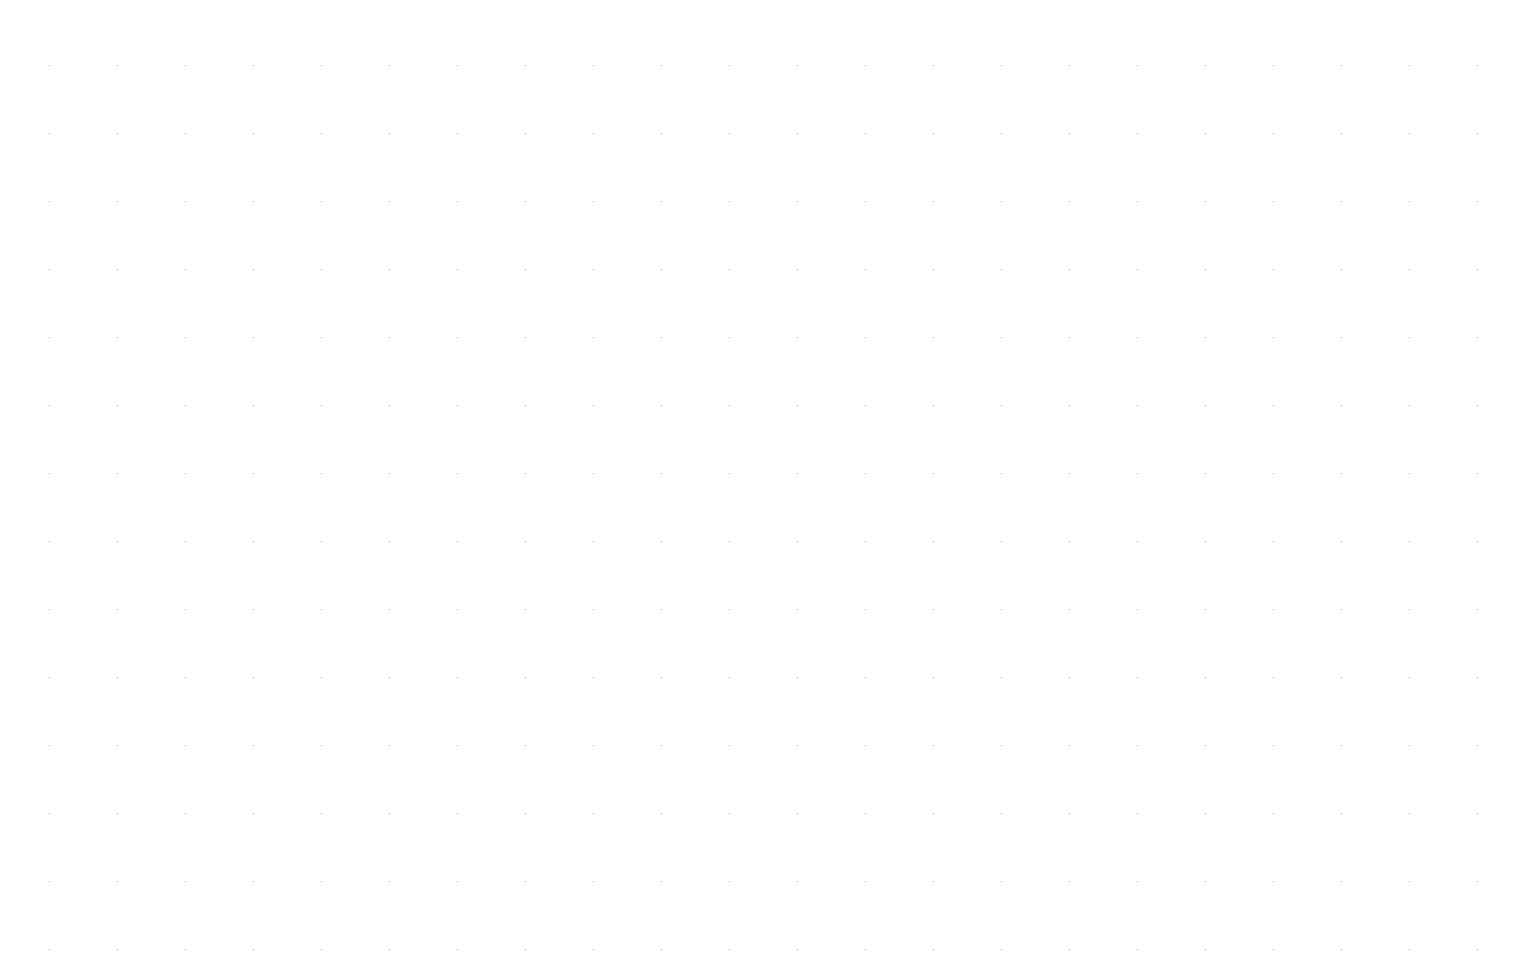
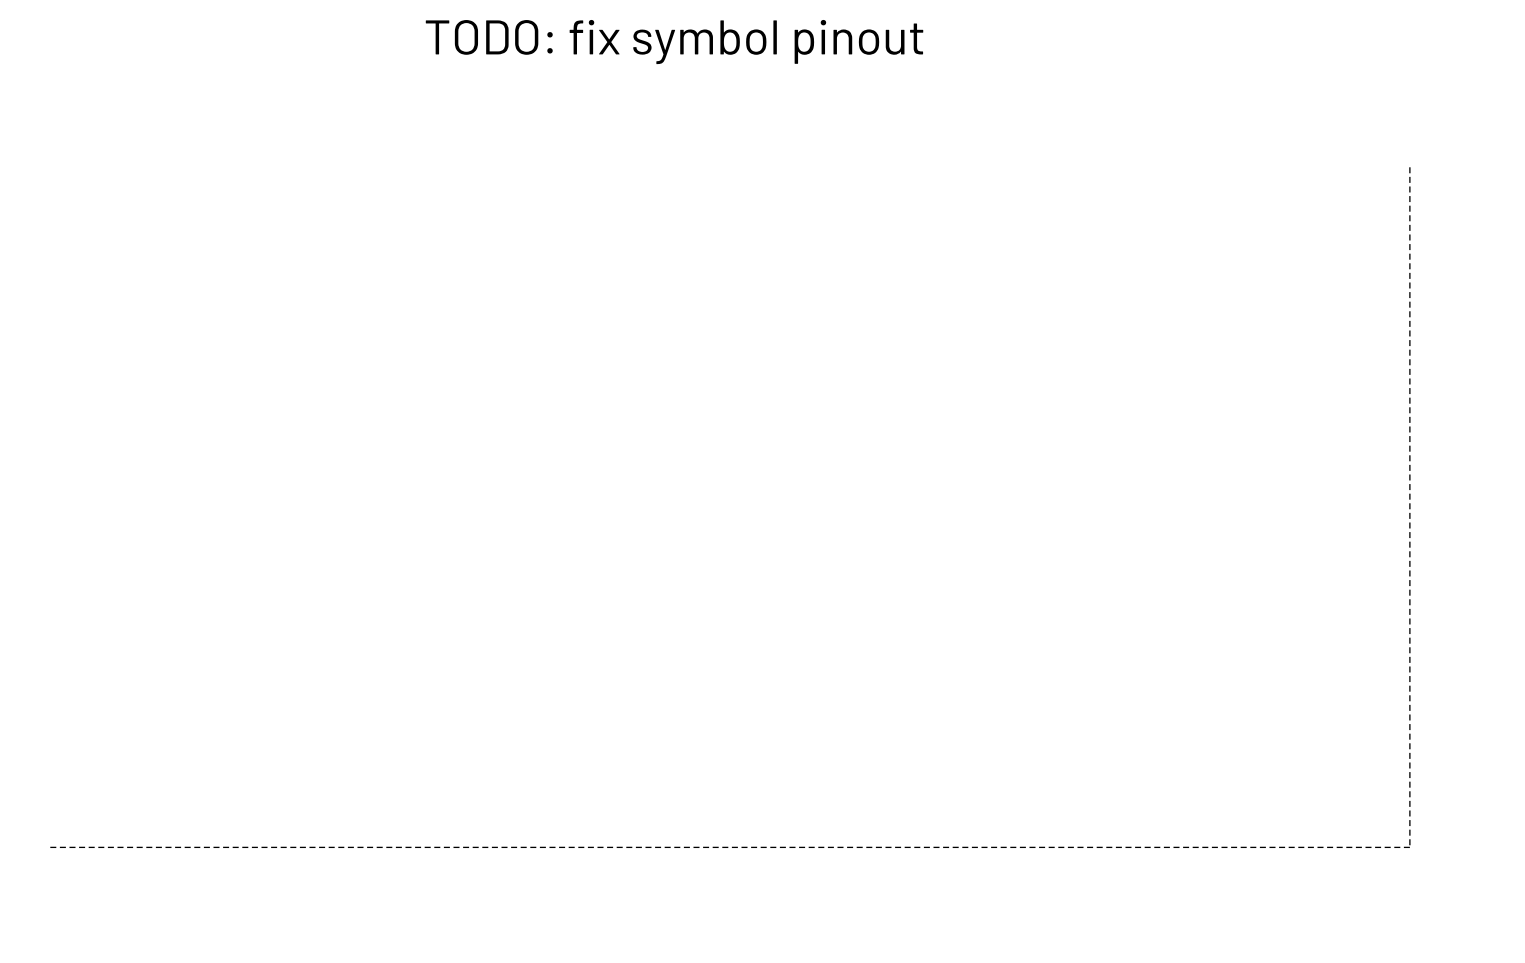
text: none -> TODO: fix symbol pinout (674, 42)
line: none -> (1409, 167) (1409, 847) (49, 847)

